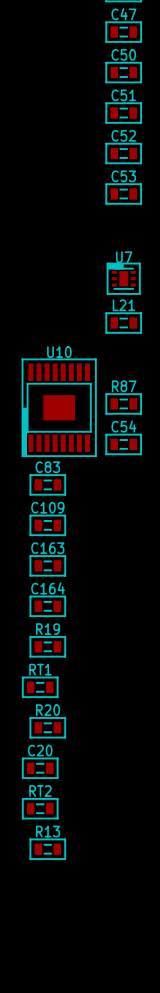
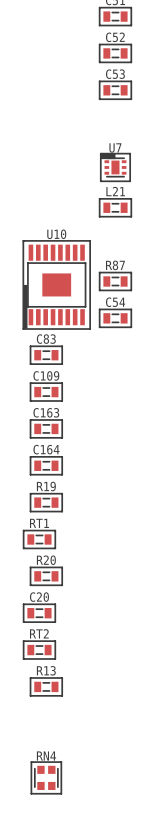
RN4: none -> (46, 777)

